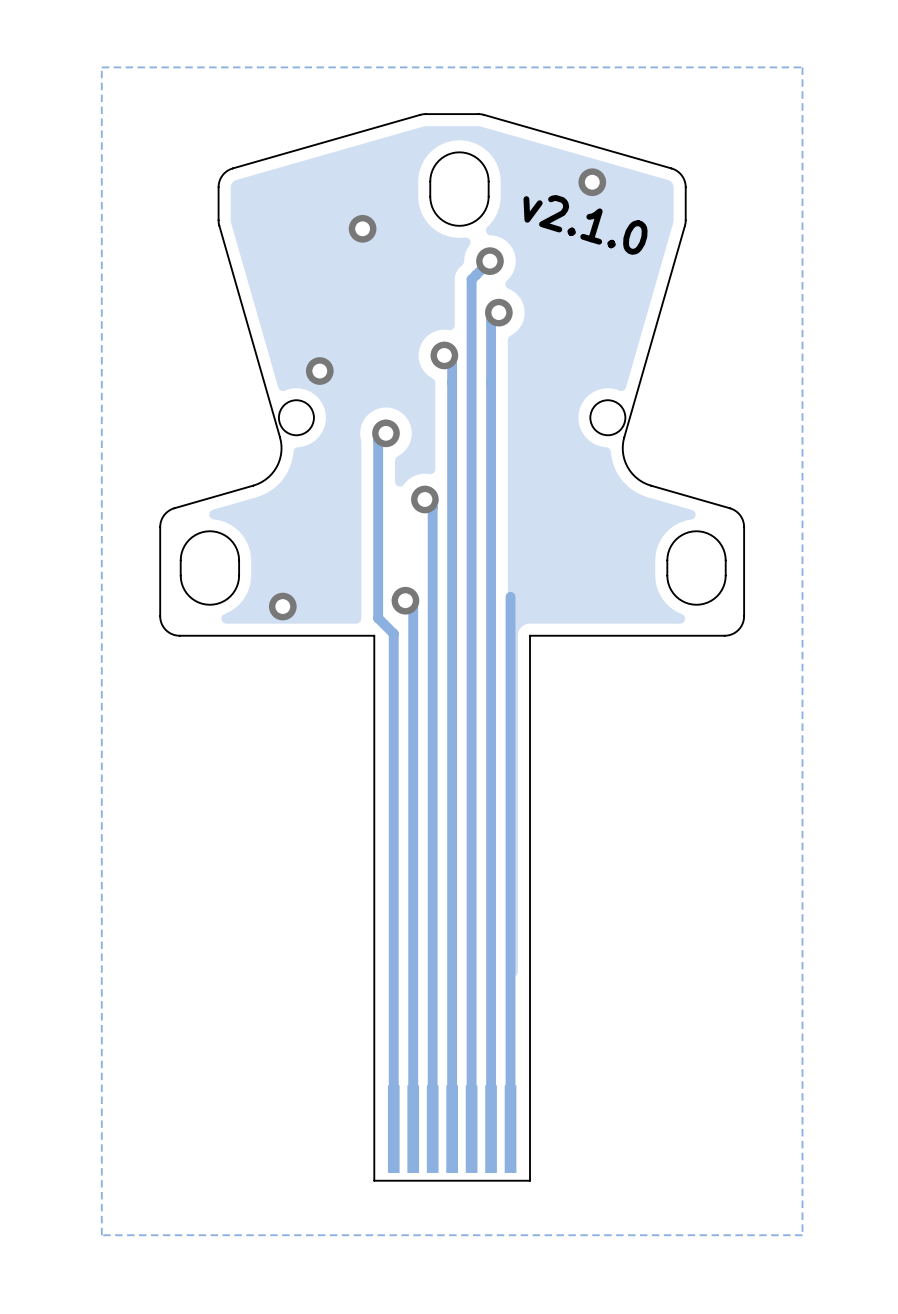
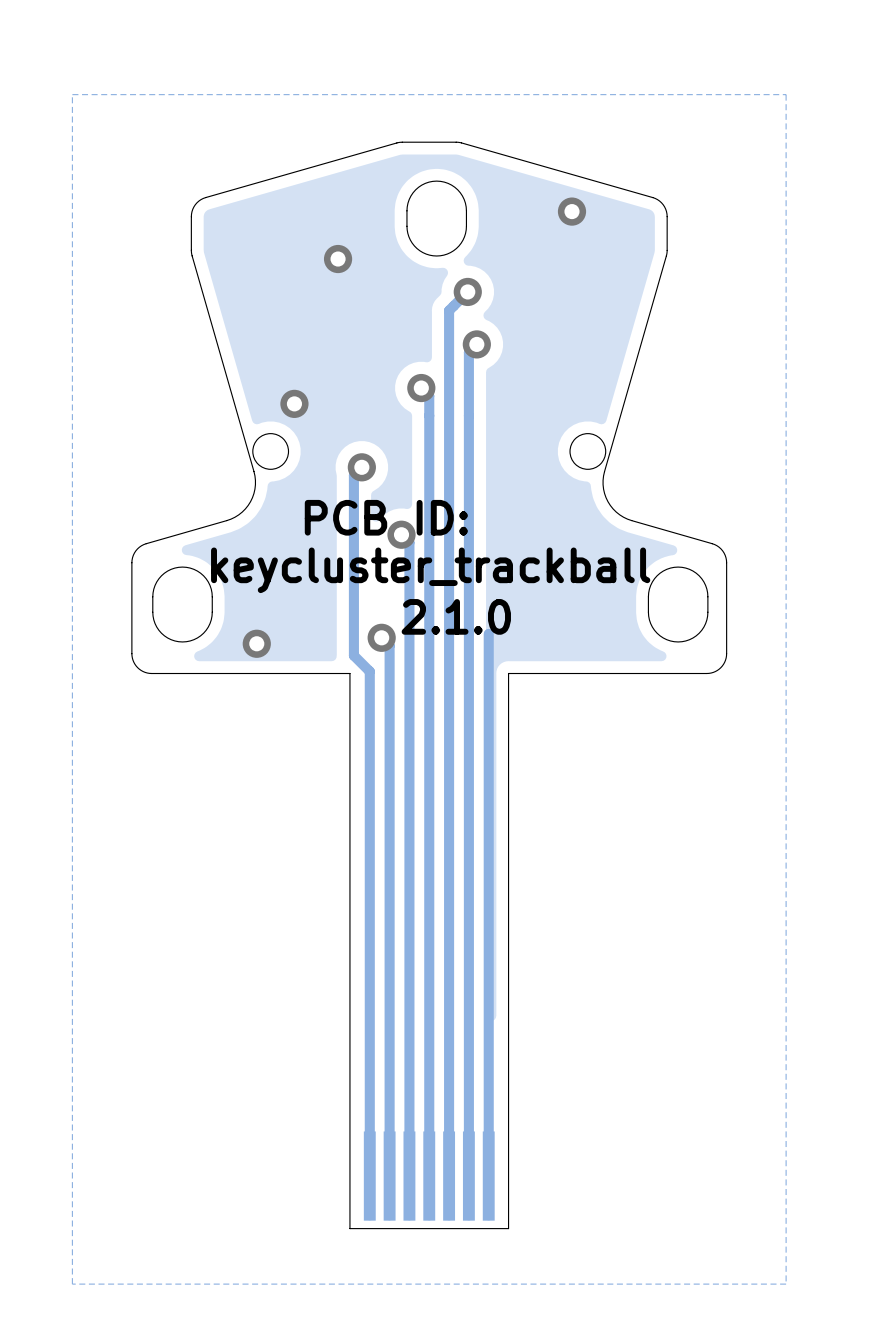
text: v2.1.0 (585, 224) -> none
text: none -> PCB ID: (386, 517)
text: none -> keycluster_trackball (430, 570)
text: none -> 2.1.0 (456, 616)

